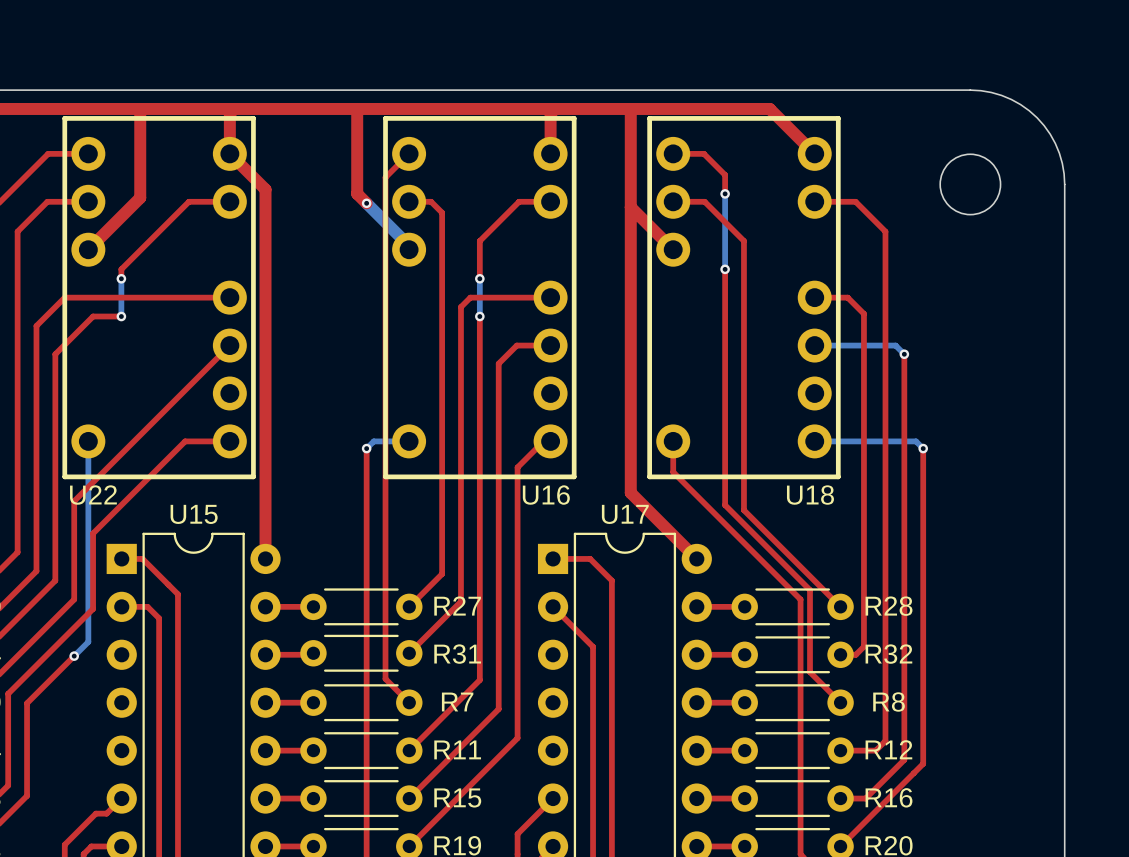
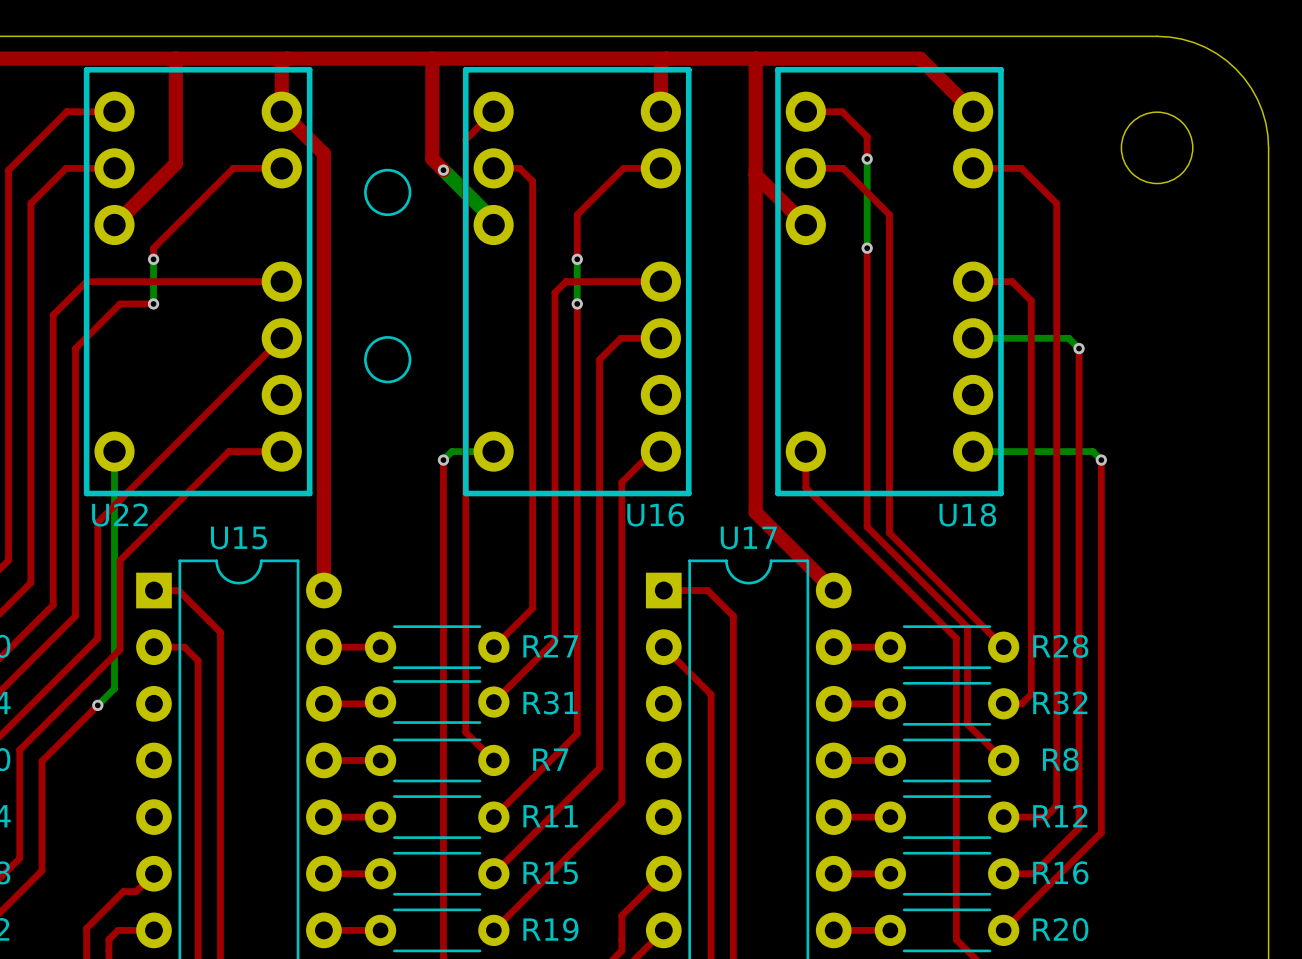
drawing: none -> [364, 168, 412, 217]
drawing: none -> [364, 336, 412, 384]

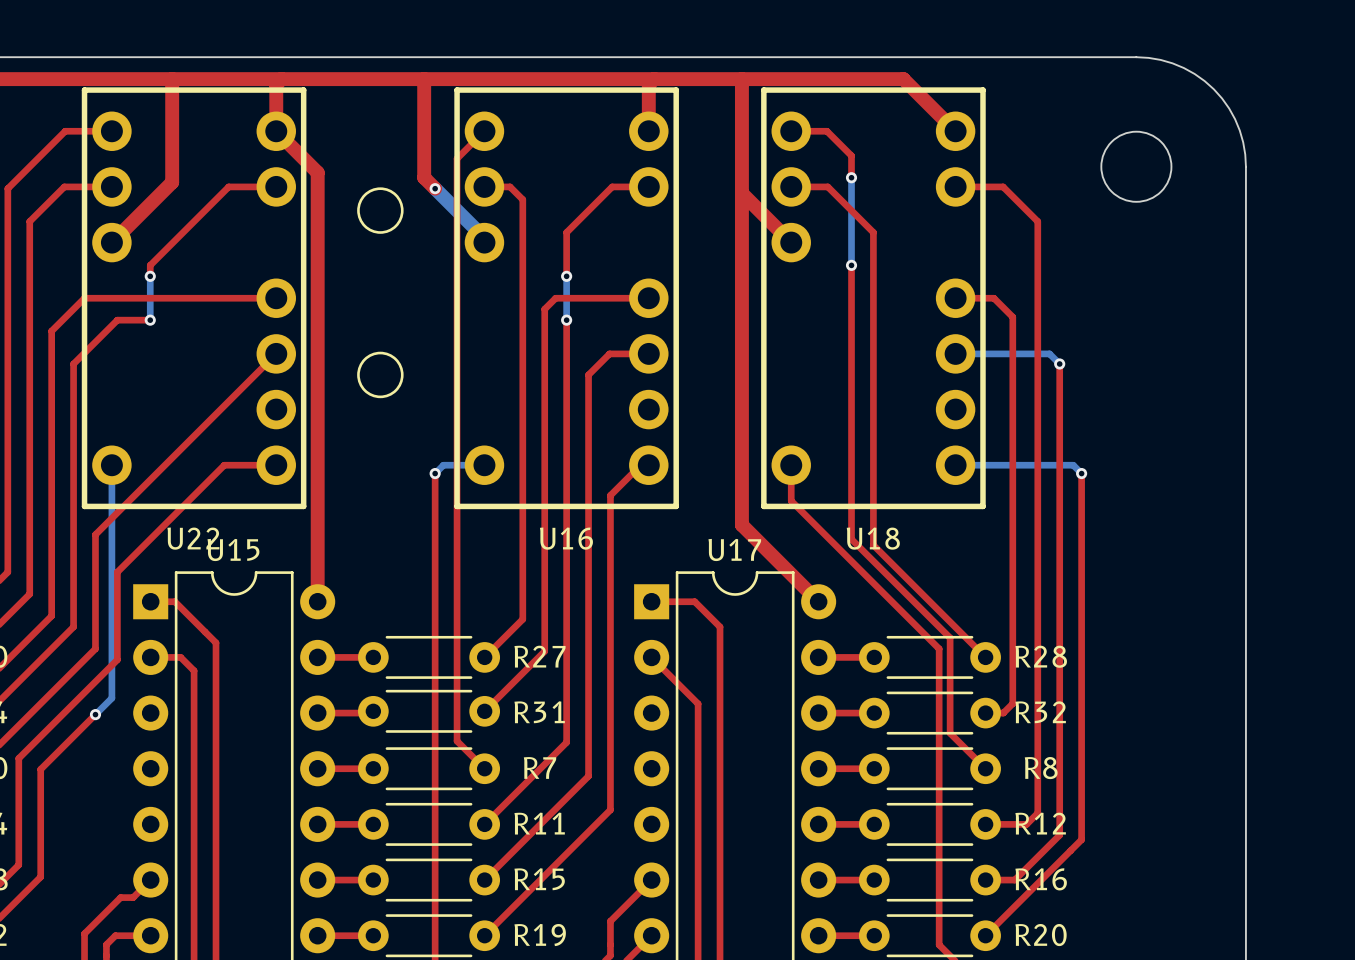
U22 name position: U22 (119, 515) -> U22 (193, 538)
U16 name position: U16 (655, 515) -> U16 (566, 538)
U18 name position: U18 (967, 515) -> U18 (873, 538)

